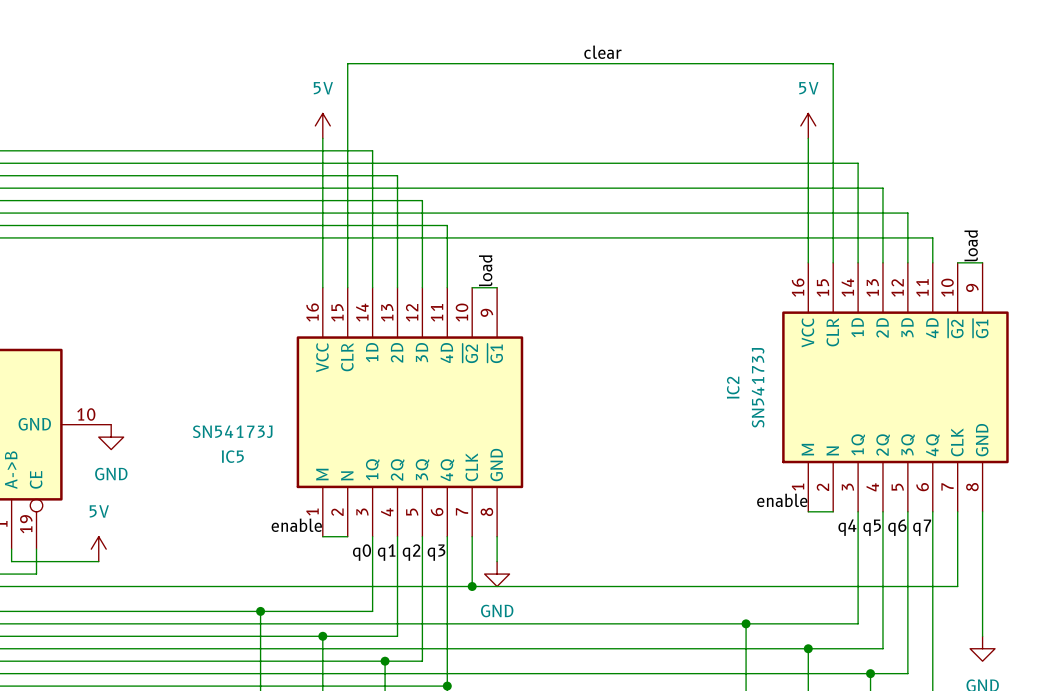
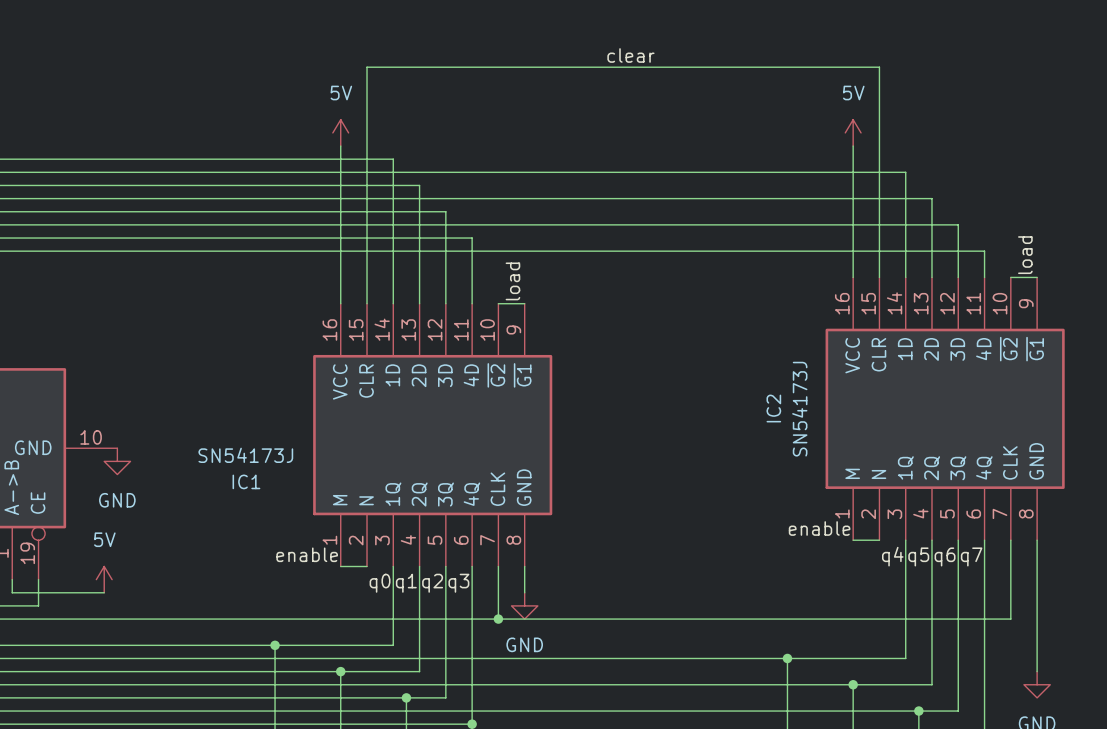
IC5 name: IC5 (232, 456) -> IC1 (246, 481)

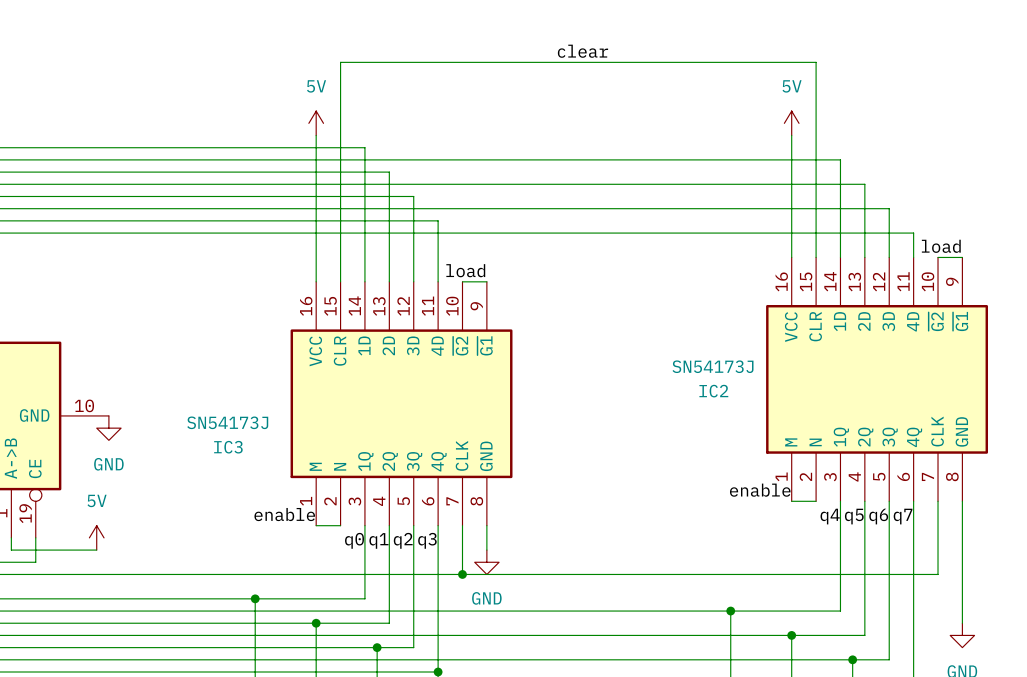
label rotation: 0° (1025, 255) -> 90° clockwise (941, 246)
label rotation: 0° (512, 281) -> 90° clockwise (465, 270)
IC2 name rotation: 0° (773, 408) -> 90° clockwise (713, 391)
IC2 value rotation: 0° (799, 409) -> 90° clockwise (713, 366)
IC1 name: IC1 (246, 481) -> IC3 (228, 447)

